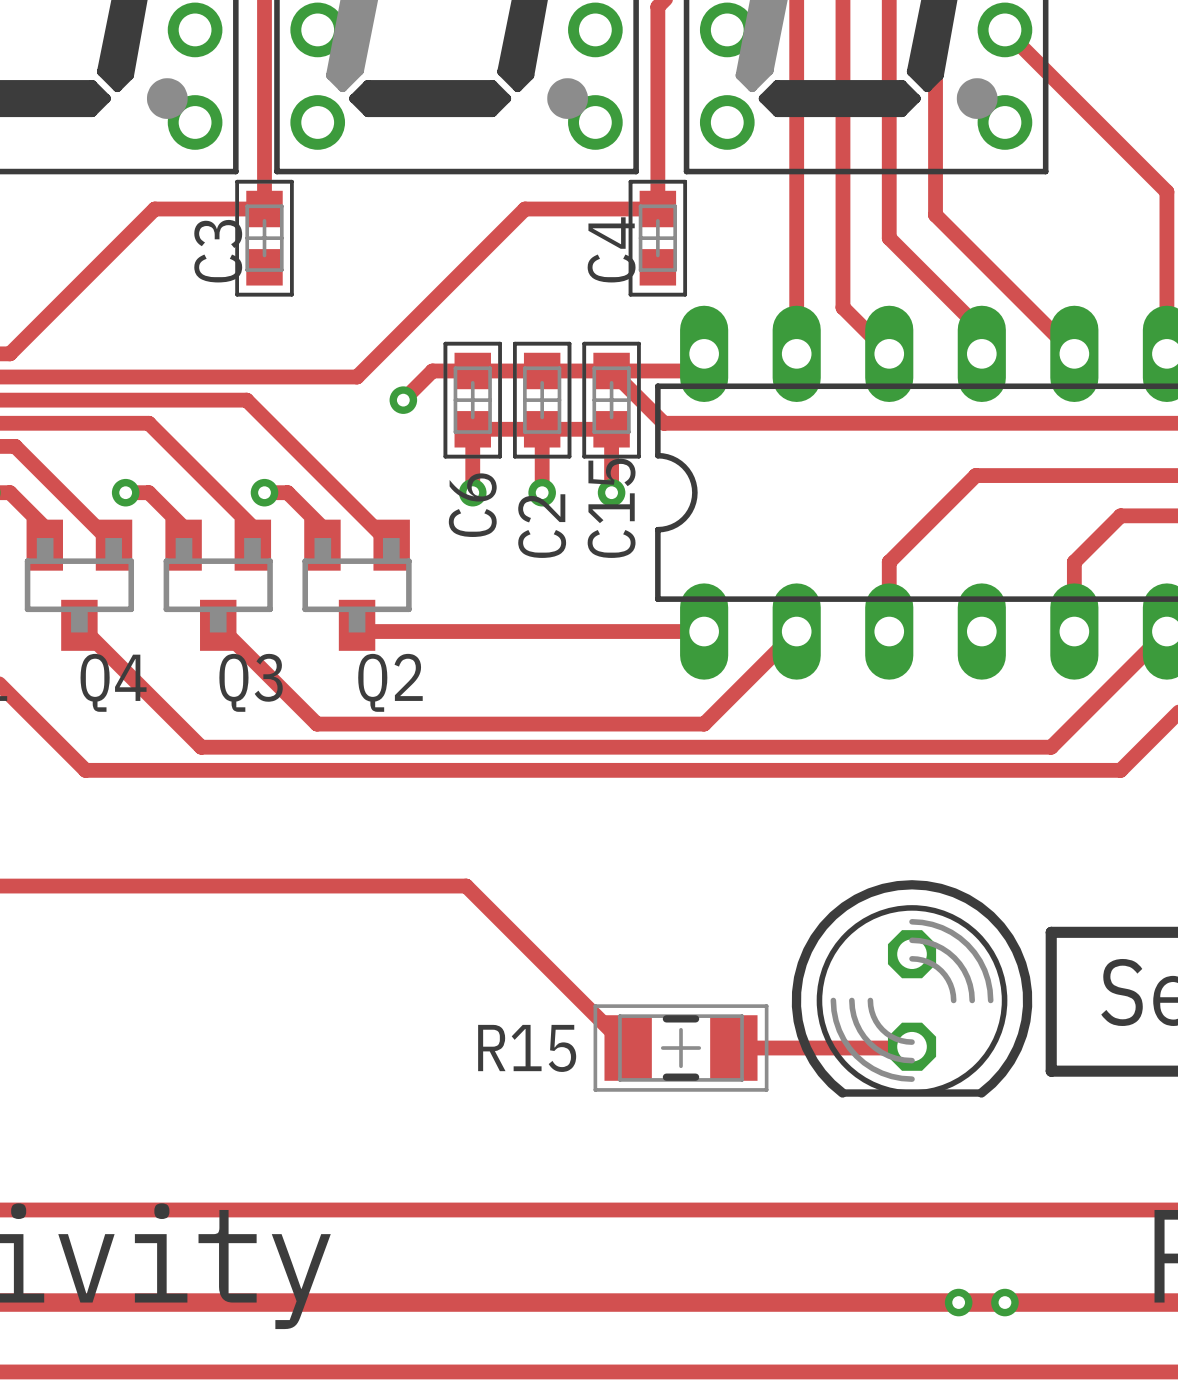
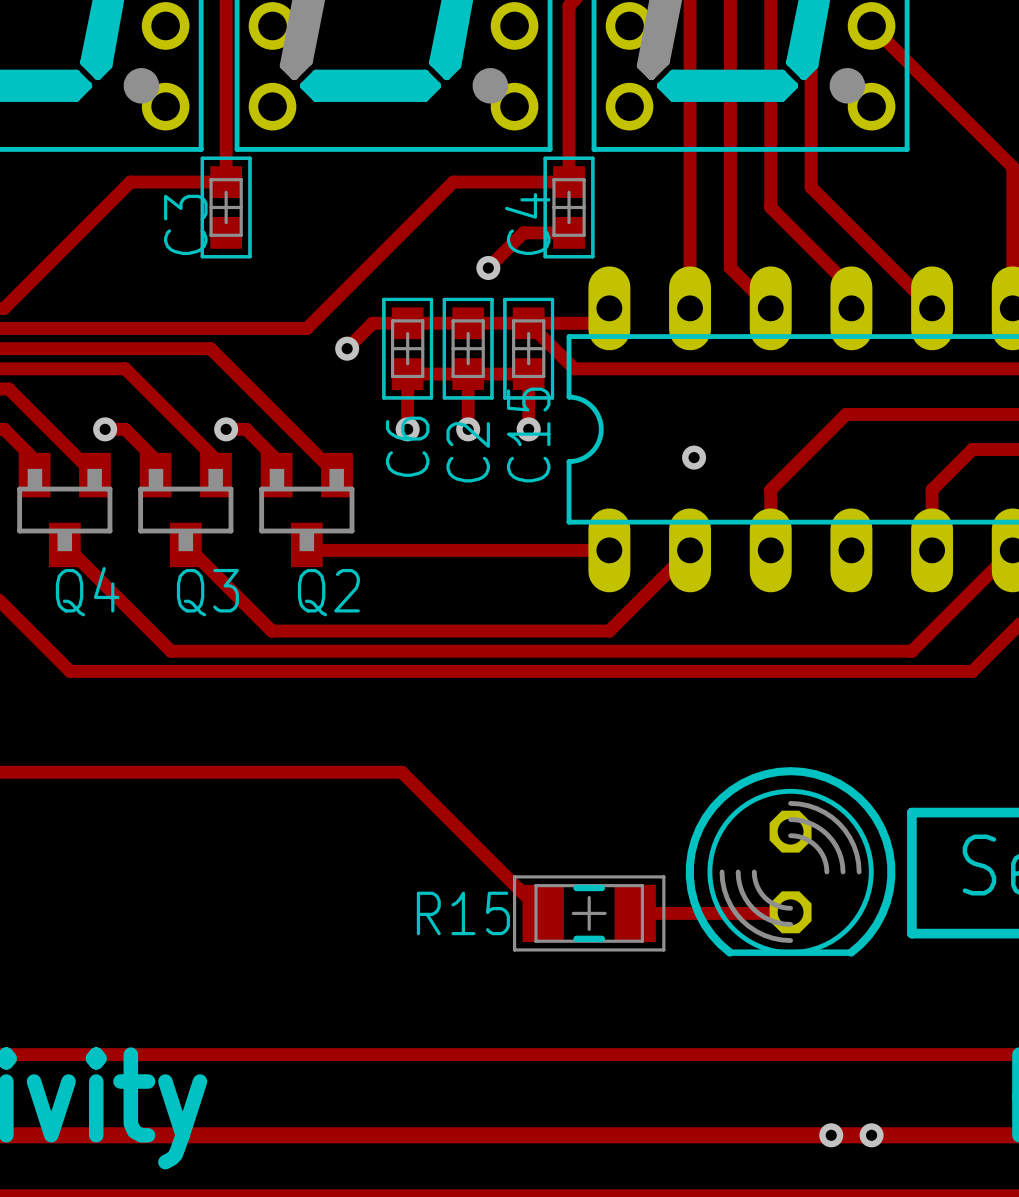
track: none -> (569, 232) (523, 232) (488, 268)
via: none -> (488, 268)
via: none -> (694, 457)

